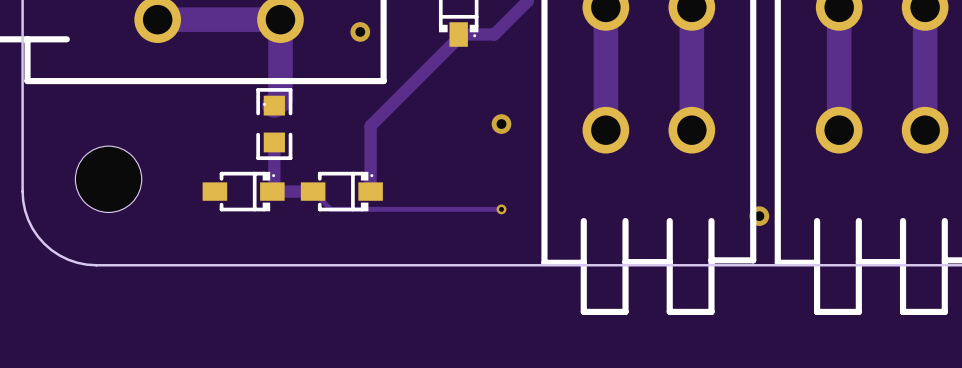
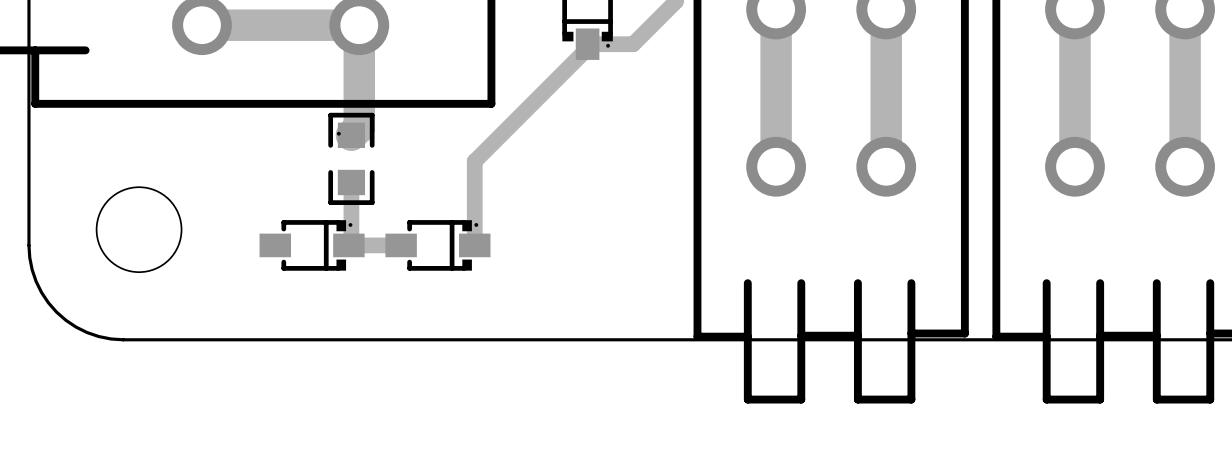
via: (360, 31) -> none
via: (501, 124) -> none
track: (313, 191) (330, 209) (501, 209) -> none
via: (501, 209) -> none
via: (759, 216) -> none

